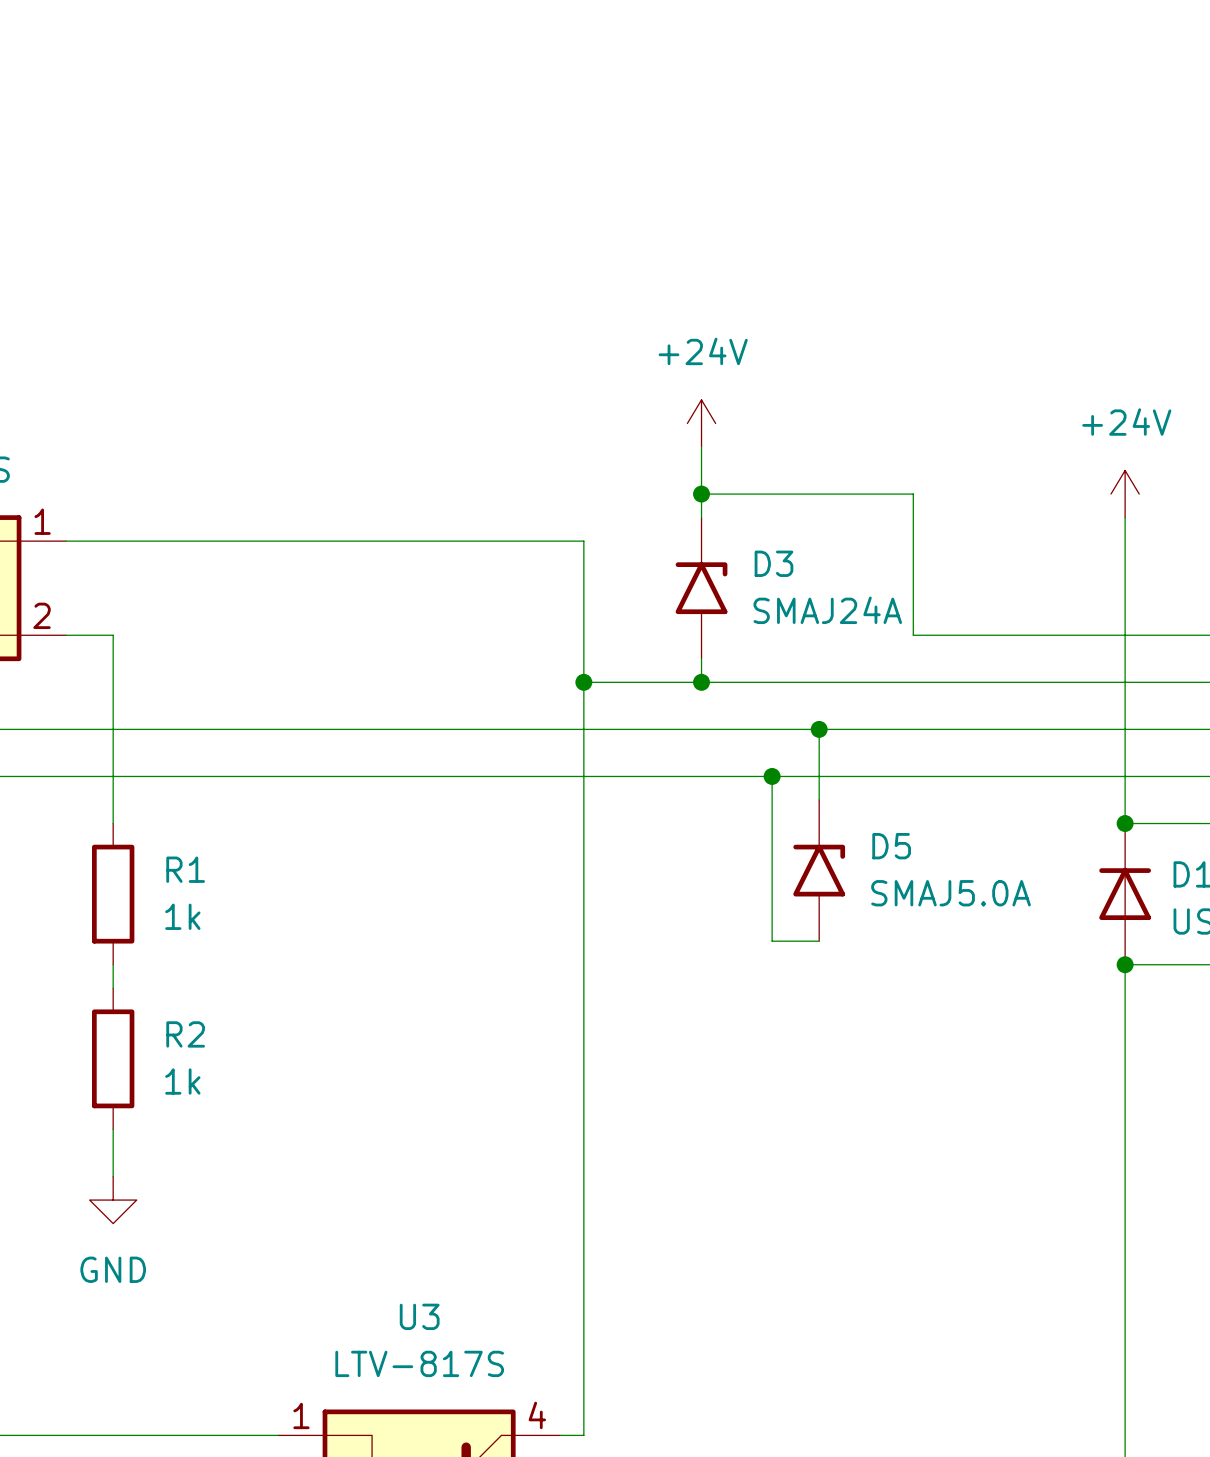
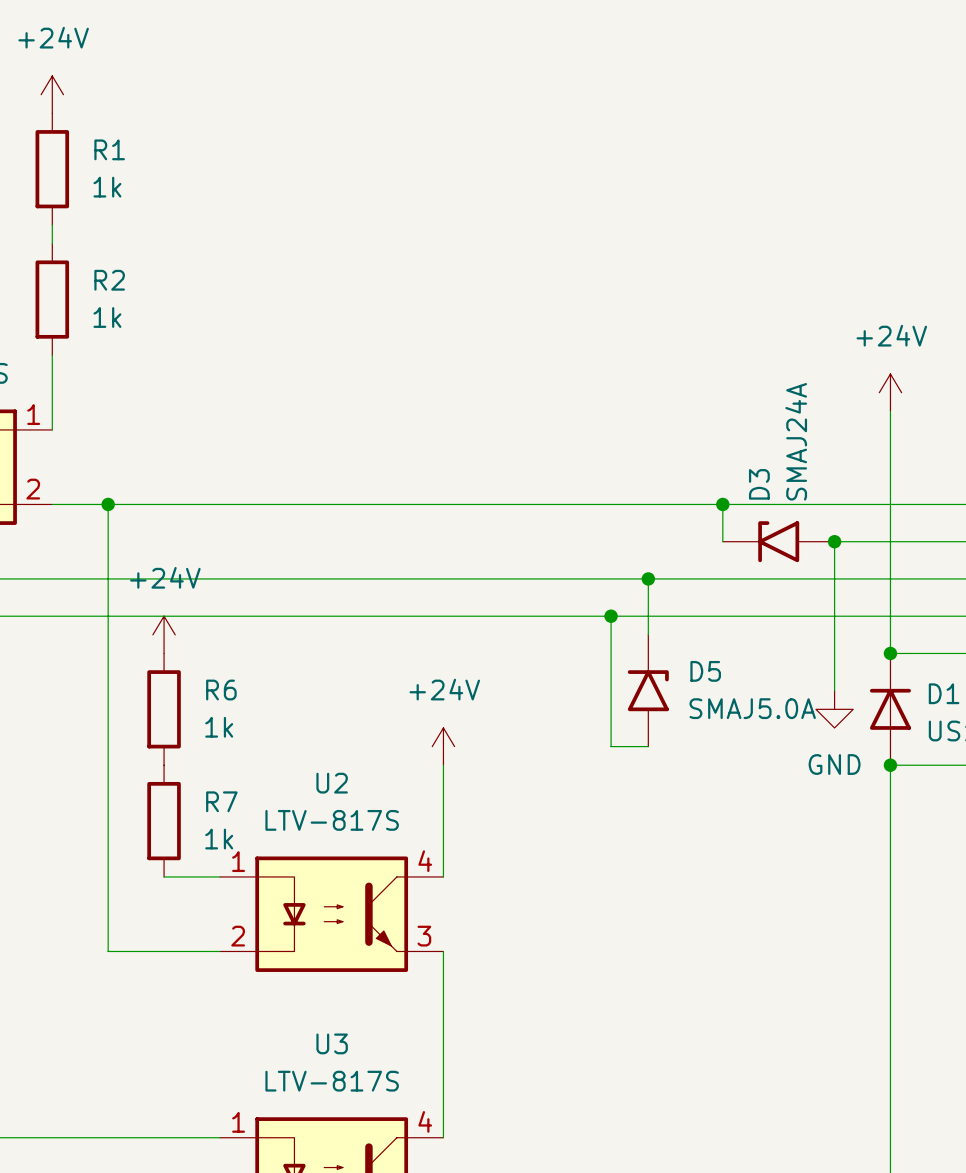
power symbol: none -> +24V (52, 94)
wire: none -> (52, 225) (52, 243)
power symbol: +24V (701, 423) -> none
wire: none -> (52, 355) (52, 429)
wire: (701, 446) (701, 517) -> none
wire: (701, 494) (913, 494) (913, 635) -> none
junction: (701, 494) -> none
wire: (66, 541) (583, 541) (583, 1435) (560, 1435) -> (443, 951) (443, 1137)
D3 rotation: 0° (701, 588) -> 90° counterclockwise (778, 541)
D3 position: (701, 588) -> (778, 541)
wire: (113, 635) (113, 823) -> (89, 504) (722, 504) (722, 541)
wire: none -> (108, 504) (108, 951) (219, 951)
junction: none -> (108, 504)
junction: none -> (722, 504)
wire: (701, 658) (701, 682) -> none
wire: (583, 682) (1054, 682) -> (834, 690) (834, 541)
junction: (583, 682) -> none
junction: (701, 682) -> none
junction: none -> (834, 541)
power symbol: none -> +24V (164, 634)
R1 position: (113, 894) -> (52, 169)
R6: none -> 1k (164, 709)
power symbol: none -> GND (834, 709)
power symbol: none -> +24V (443, 746)
wire: (113, 964) (113, 988) -> none
wire: none -> (443, 765) (443, 876)
R7: none -> 1k (164, 821)
R2 position: (113, 1058) -> (52, 299)
wire: none -> (164, 876) (219, 876)
wire: (113, 1129) (113, 1176) -> none
U2: none -> LTV-817S (331, 914)
power symbol: GND (113, 1200) -> none

